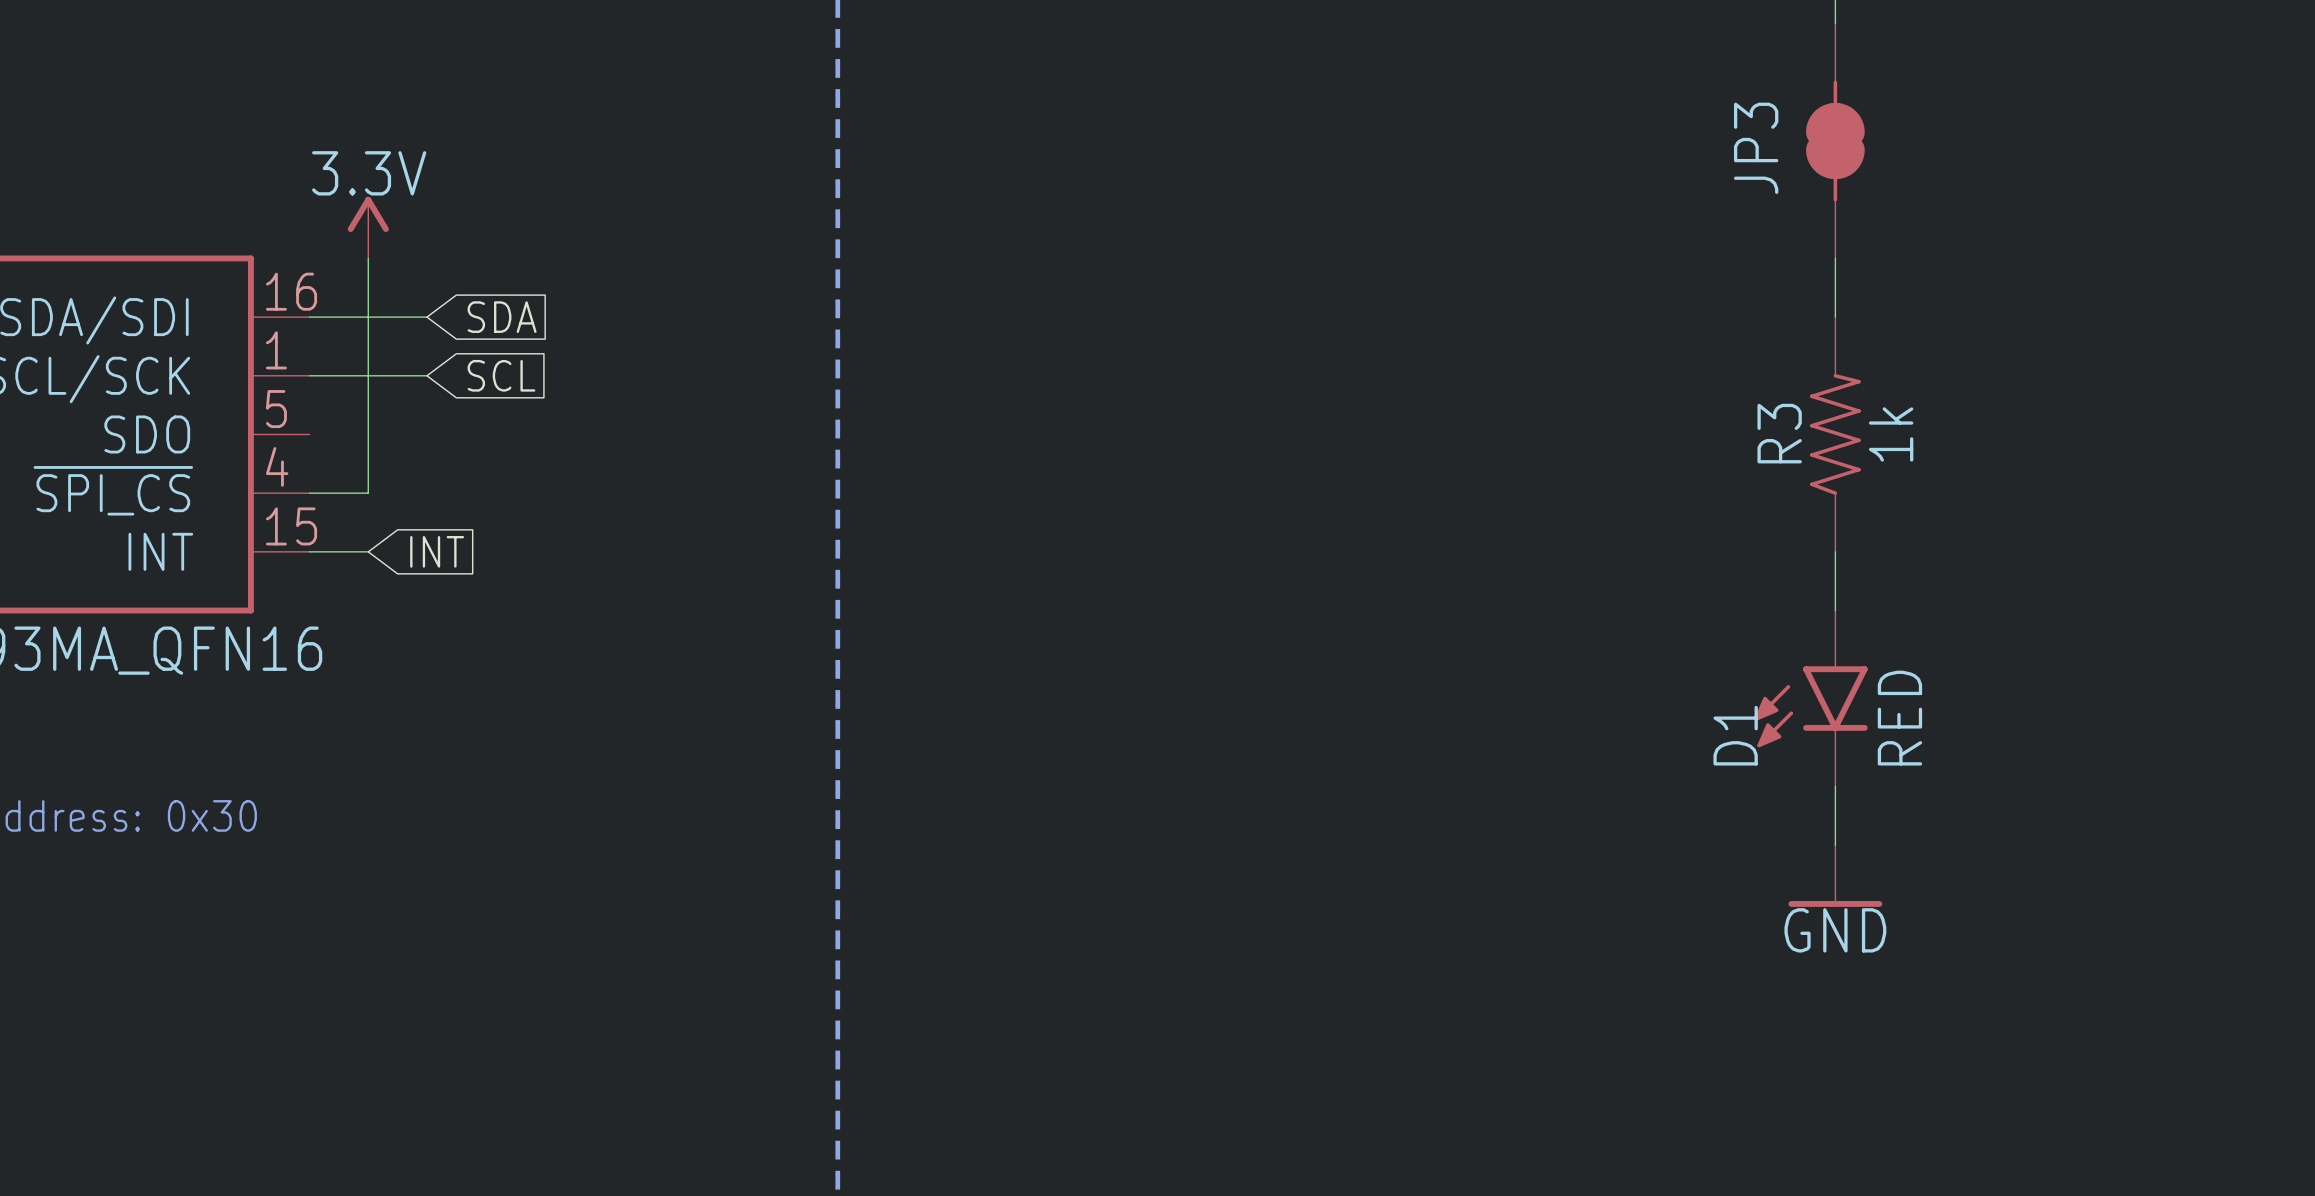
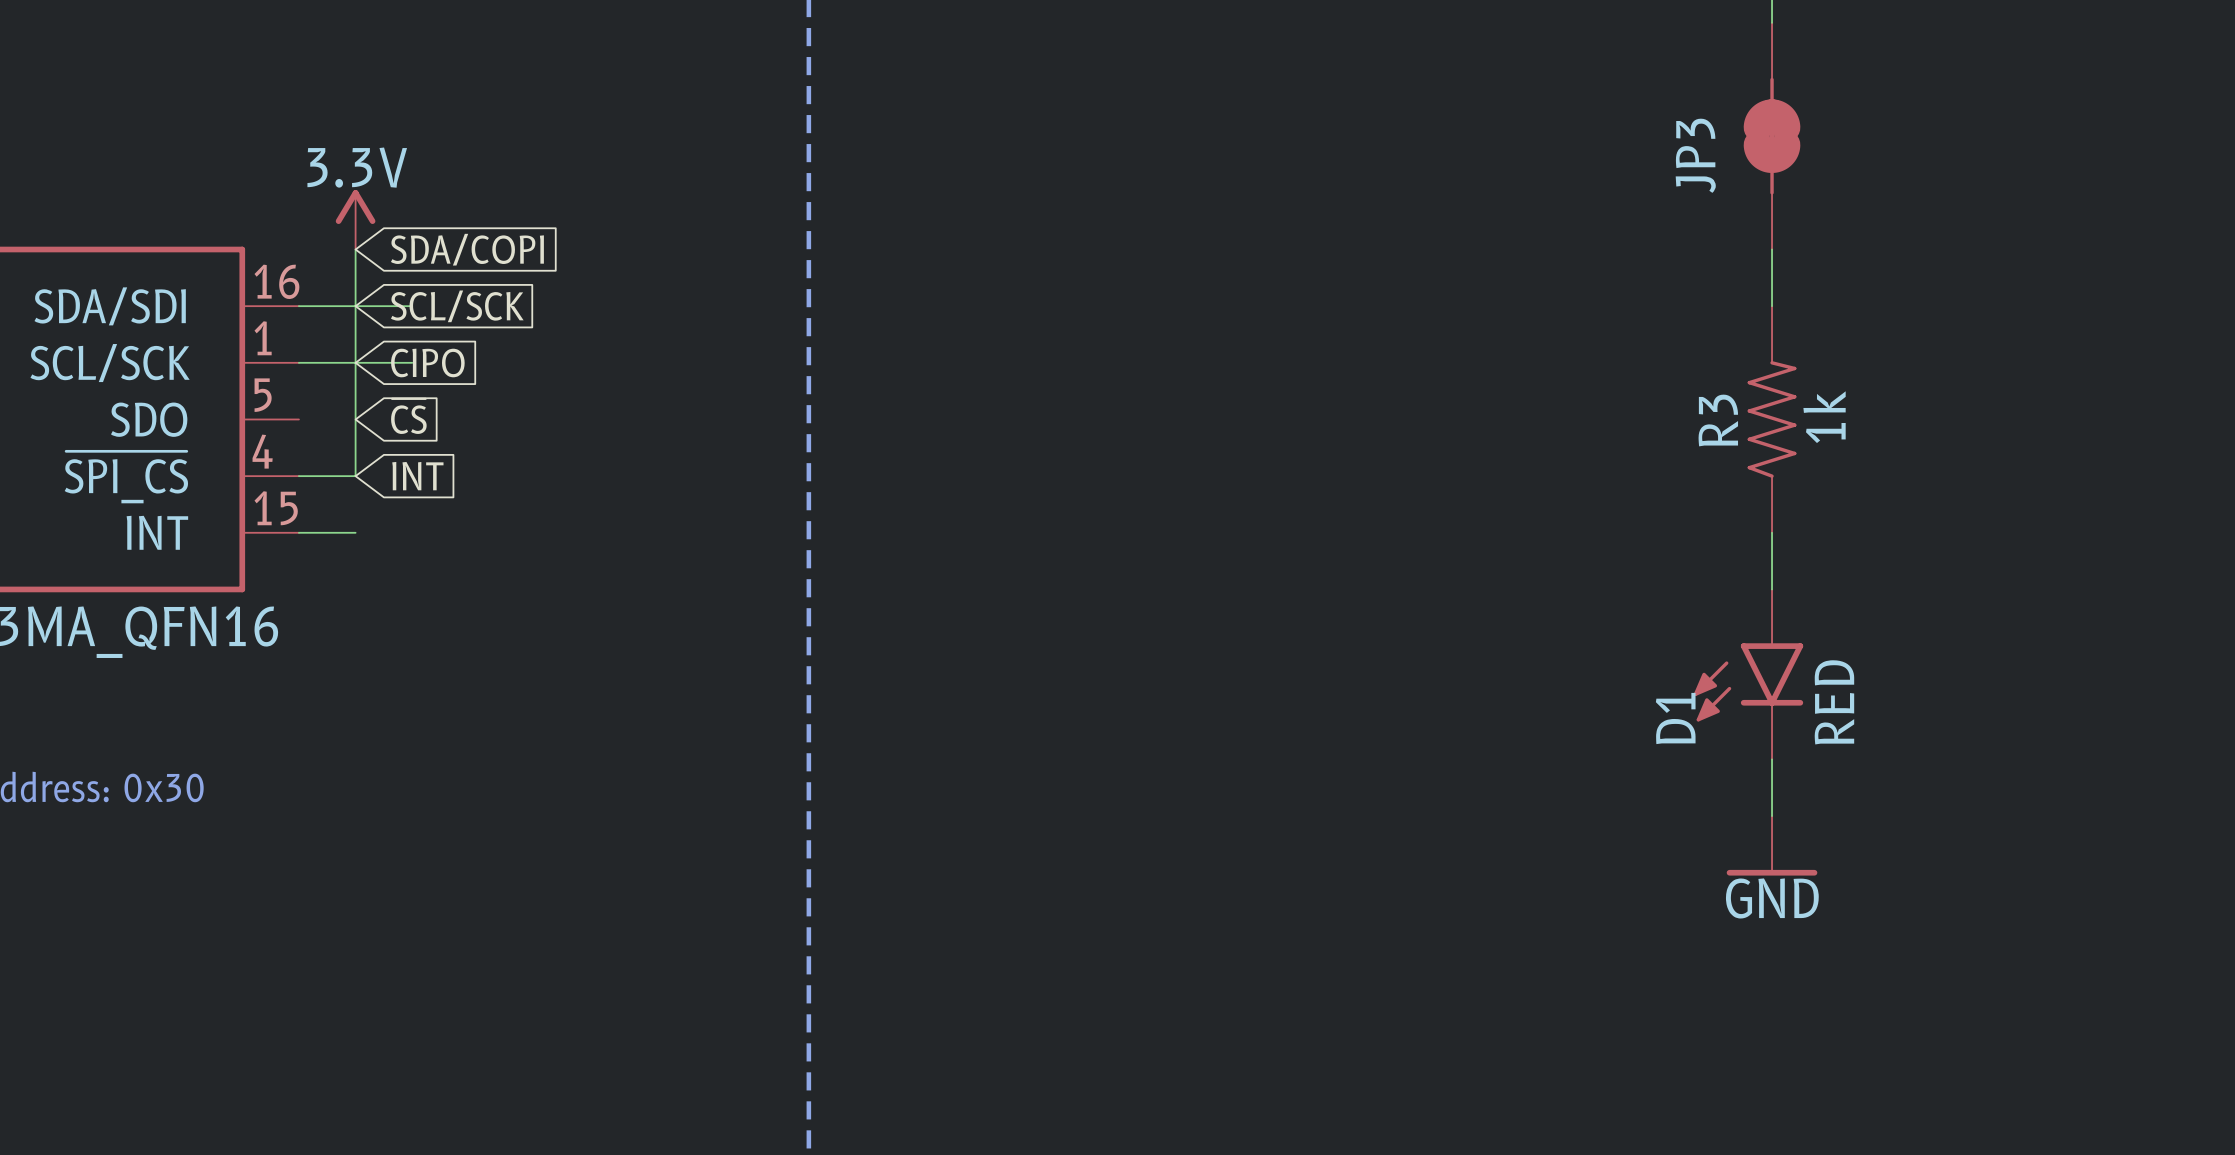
global label: none -> SDA/COPI (467, 249)
global label: SDA (502, 317) -> none
global label: none -> SCL/SCK (457, 306)
global label: none -> CIPO (427, 362)
global label: SCL (501, 375) -> none
global label: none -> ~{CS} (408, 416)
global label position: INT (437, 551) -> INT (417, 476)

